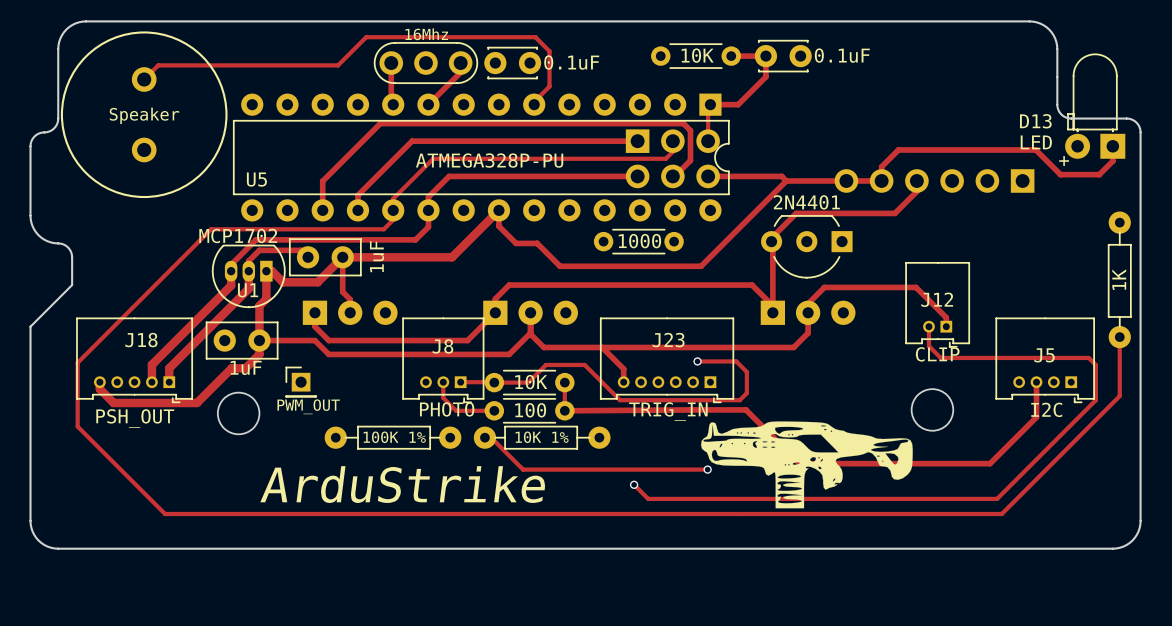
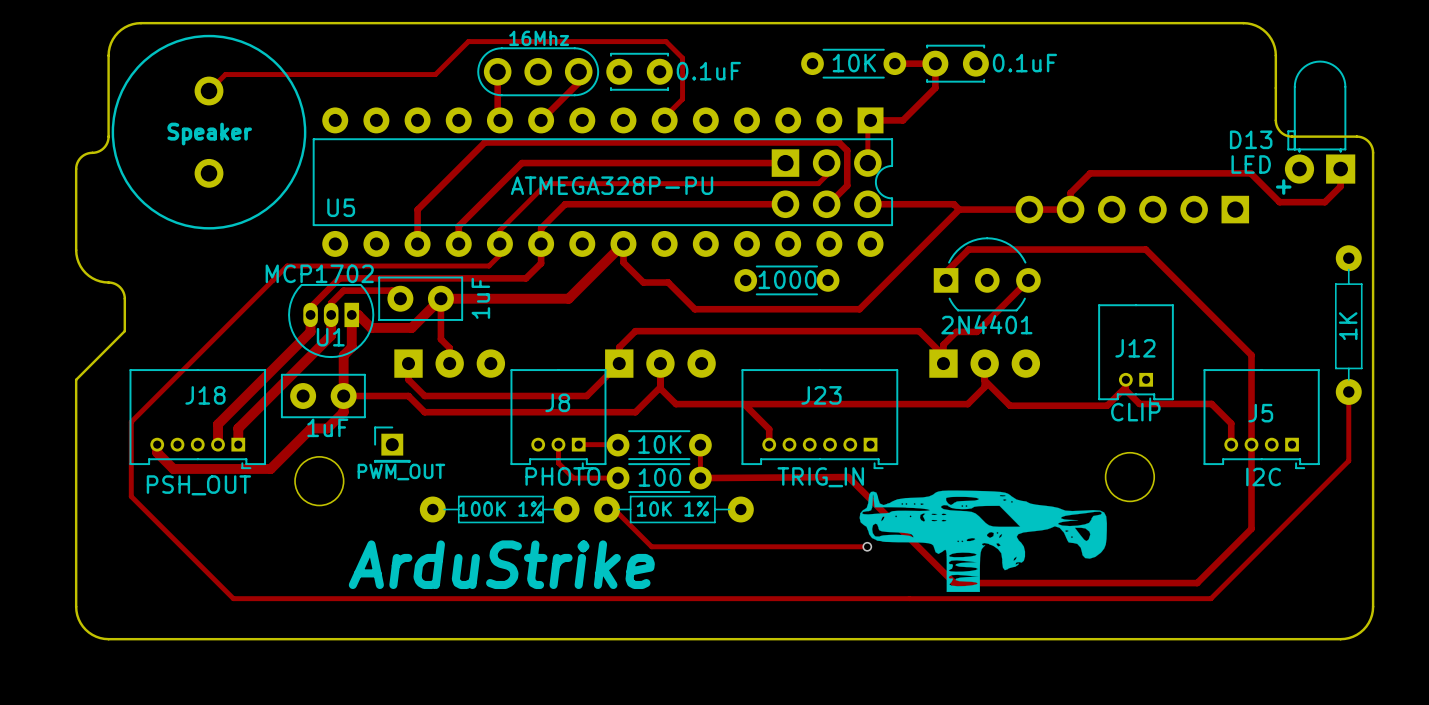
track: (916, 180) (916, 191) (894, 213) (796, 213) (794, 215) -> (1251, 444) (1251, 355) (1145, 249) (968, 249)
track: (775, 234) (771, 238) (772, 296) -> (1028, 280) (976, 331) (956, 331) (943, 344)
part rotation: 0° (806, 246) -> 180° (987, 274)
track: (808, 312) (808, 303) (824, 287) (916, 287) (946, 317) (946, 326) -> none
track: none -> (984, 380) (1009, 405) (1107, 405) (1125, 387)
track: (928, 335) (928, 346) (940, 357) (1088, 357) (1095, 364) (1095, 400) (997, 498) (648, 498) (634, 484) -> (1125, 390) (1139, 403) (1211, 403) (1231, 423) (1231, 444)
track: (697, 361) (736, 361) (746, 372) (746, 393) (739, 400) (620, 400) (584, 364) (545, 364) (528, 382) (494, 382) -> none
via: (697, 361) -> none
track: (690, 409) (746, 409) (799, 463) (990, 463) (1036, 417) -> (848, 477) (954, 583) (1197, 583) (1251, 528) (1251, 485)
via: (634, 484) -> none

